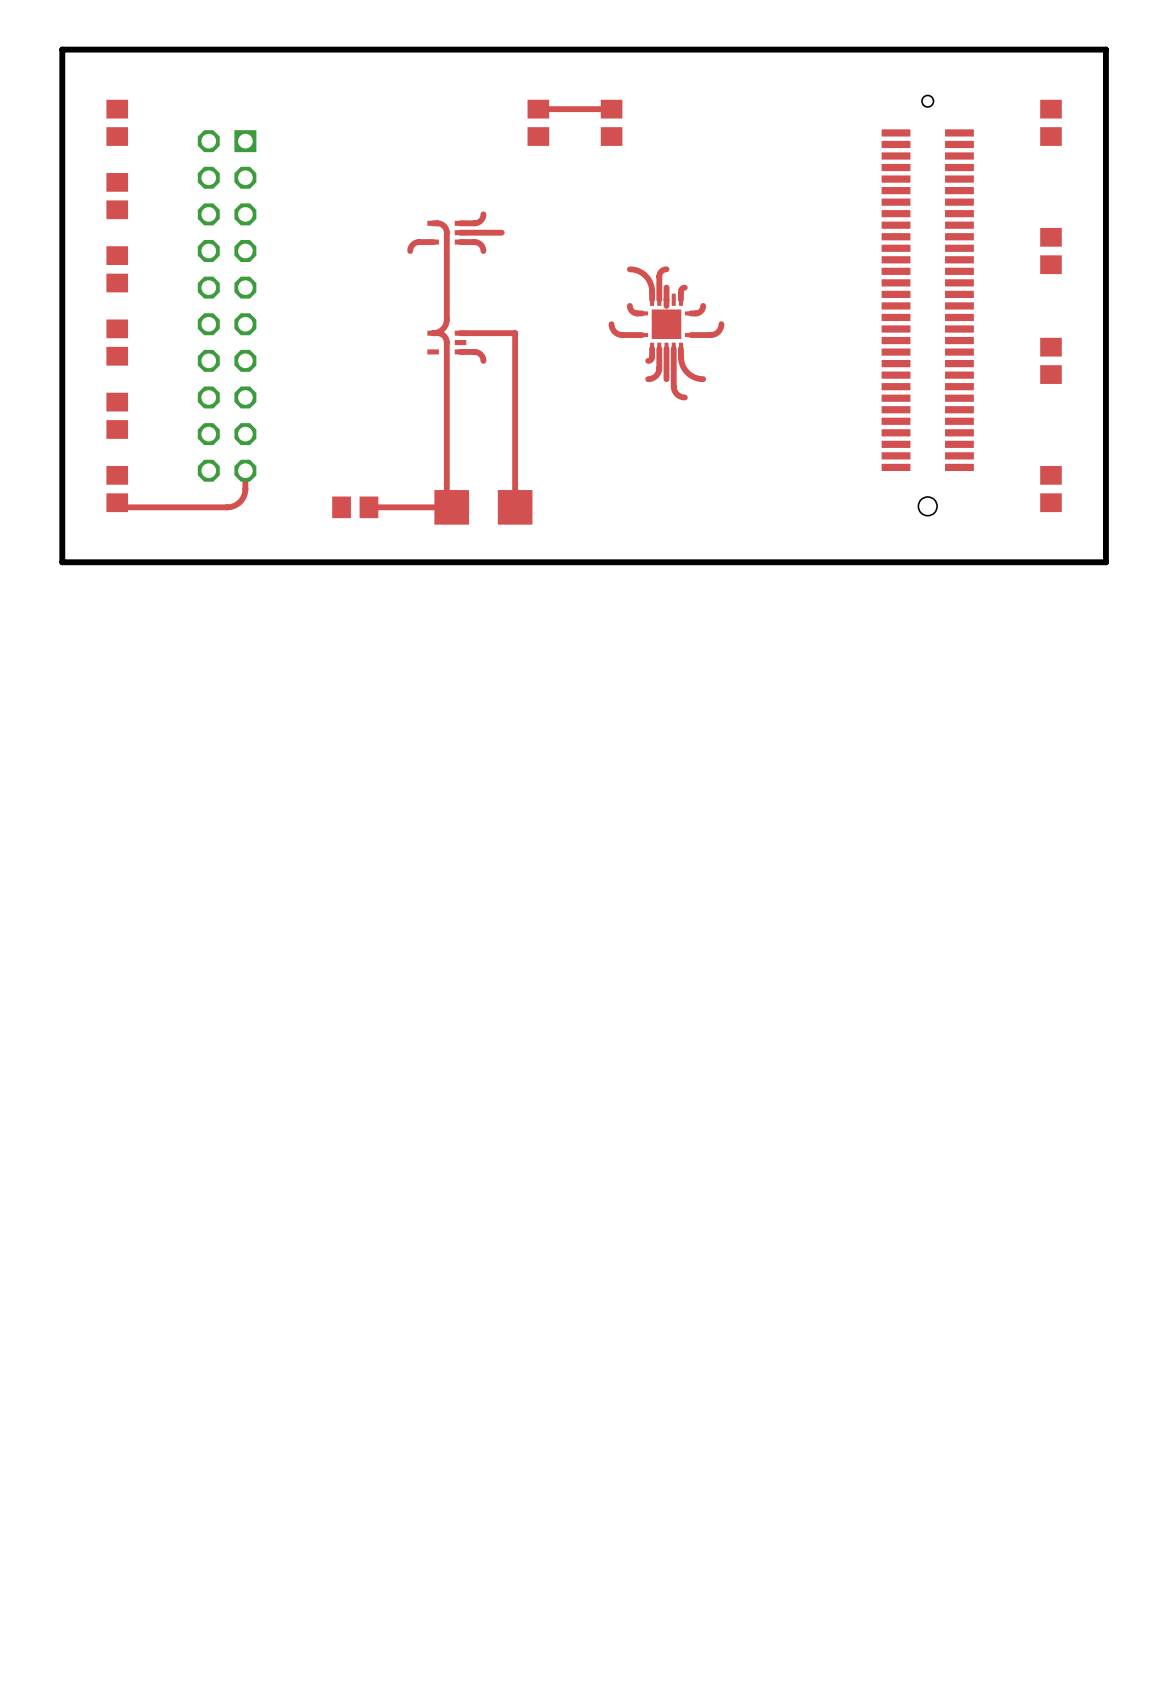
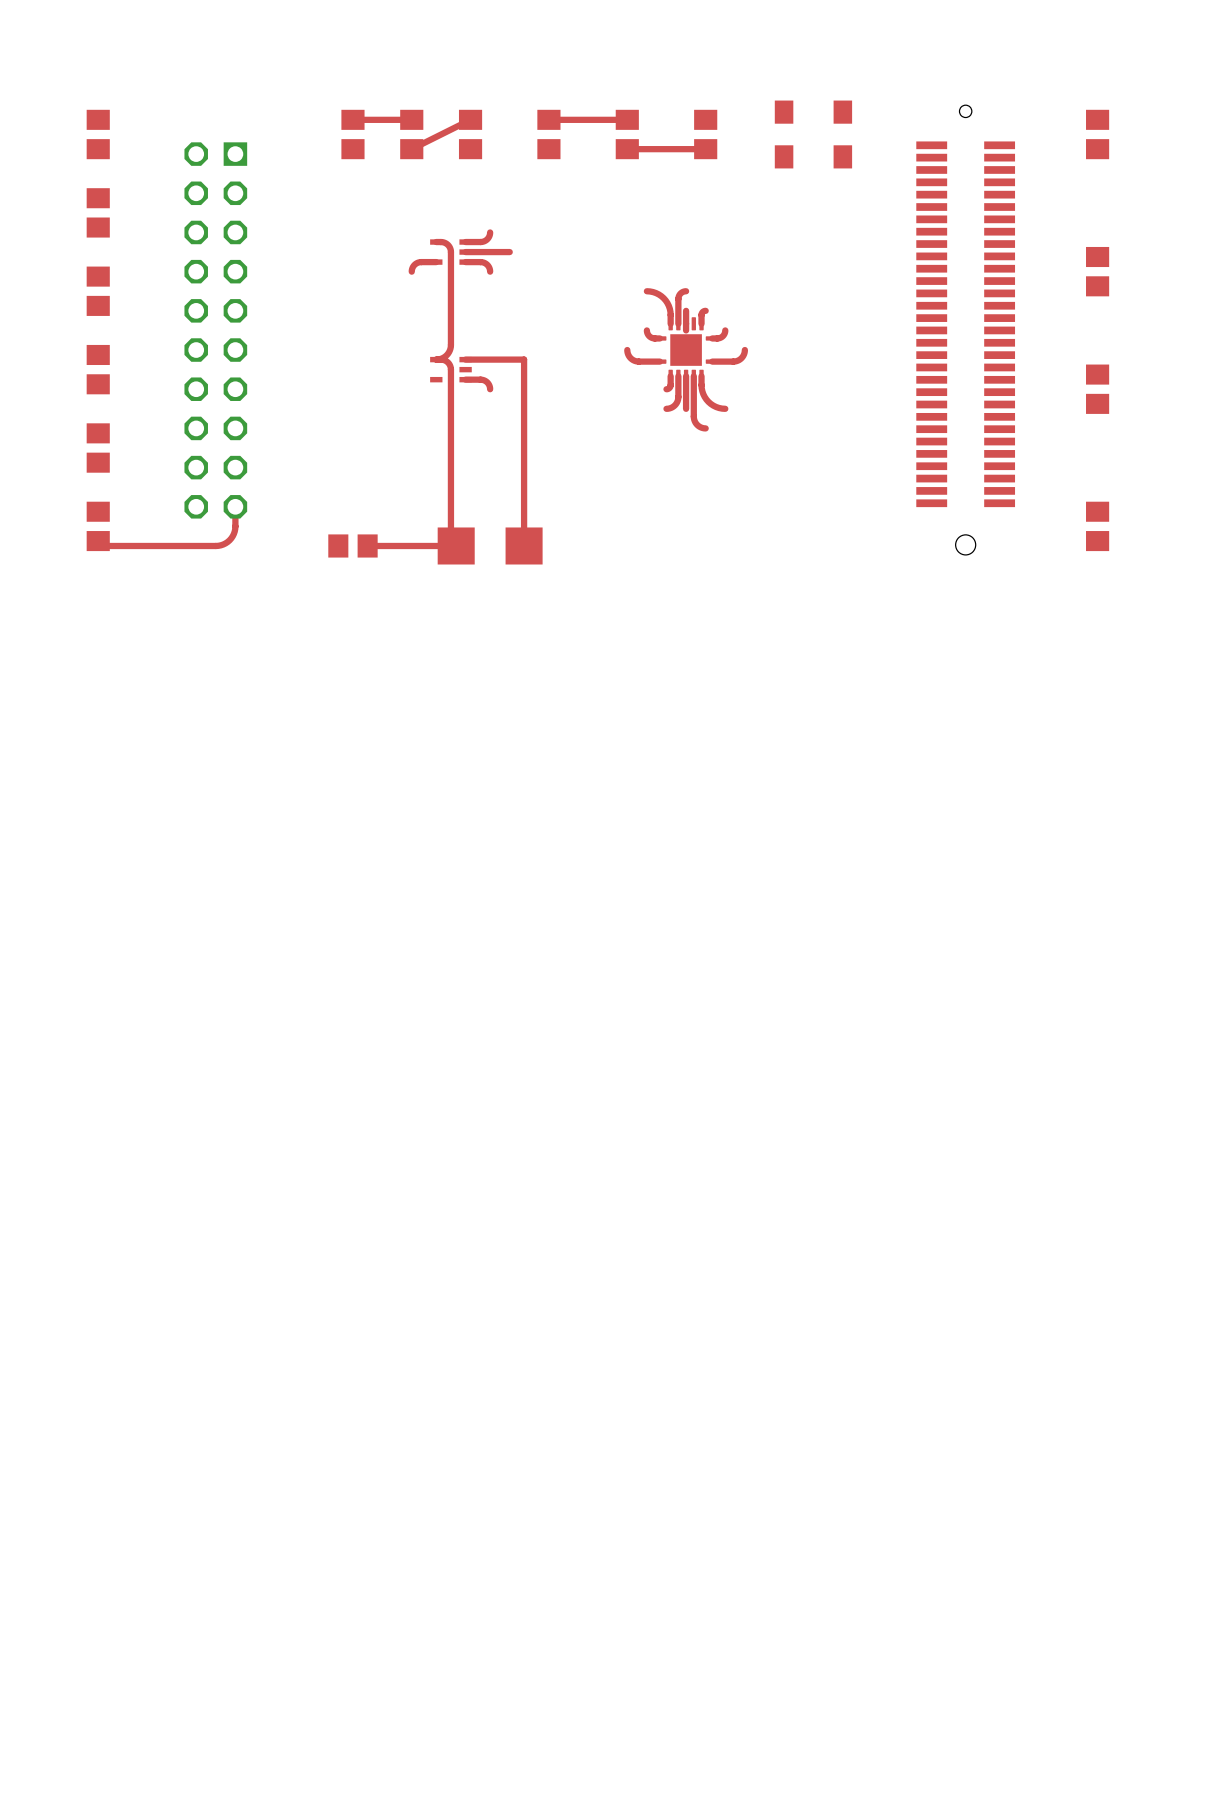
board edge: (1105, 49) (1105, 562) (62, 562) (62, 49) (1105, 49) -> none
top track: none -> (411, 119) (352, 119)
top track: none -> (470, 119) (411, 149)
part: none -> (352, 134)
part: none -> (411, 134)
part: none -> (470, 134)
part: none -> (705, 134)
part: none -> (784, 134)
part: none -> (842, 134)
top track: none -> (705, 149) (627, 149)

